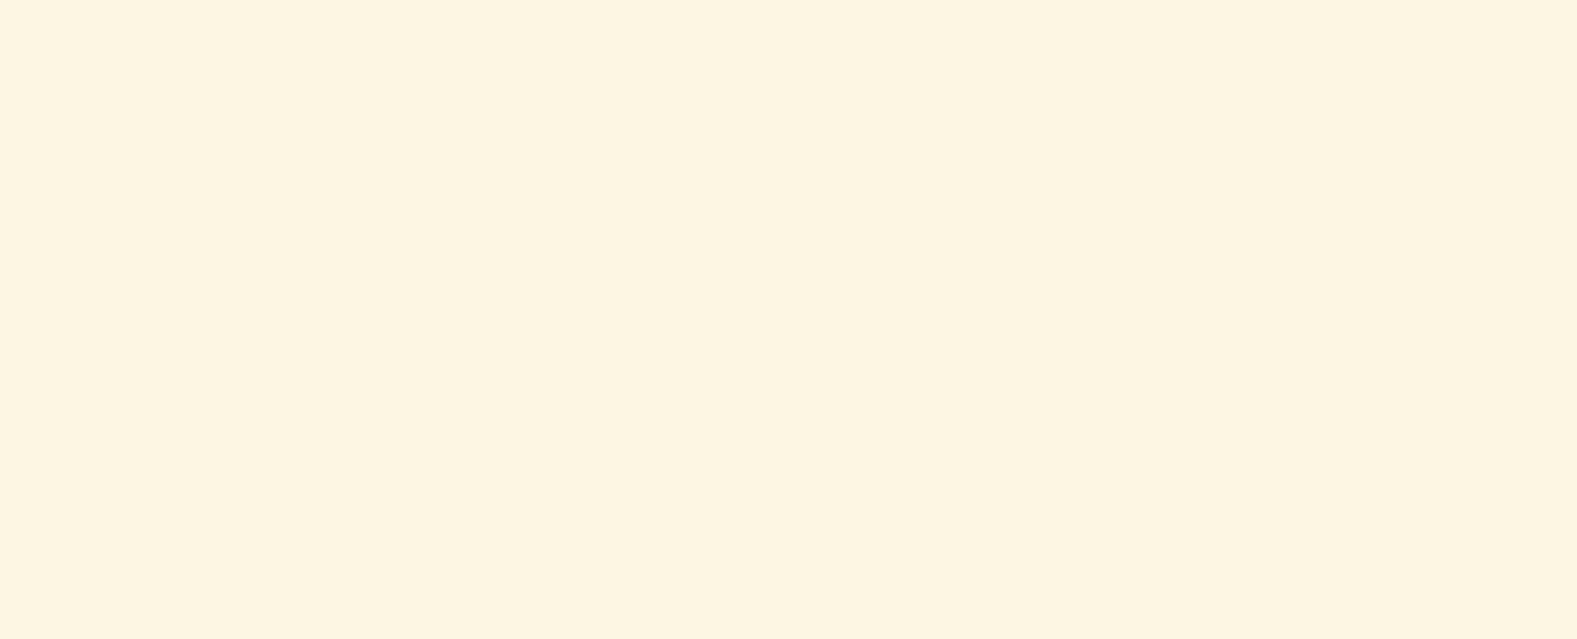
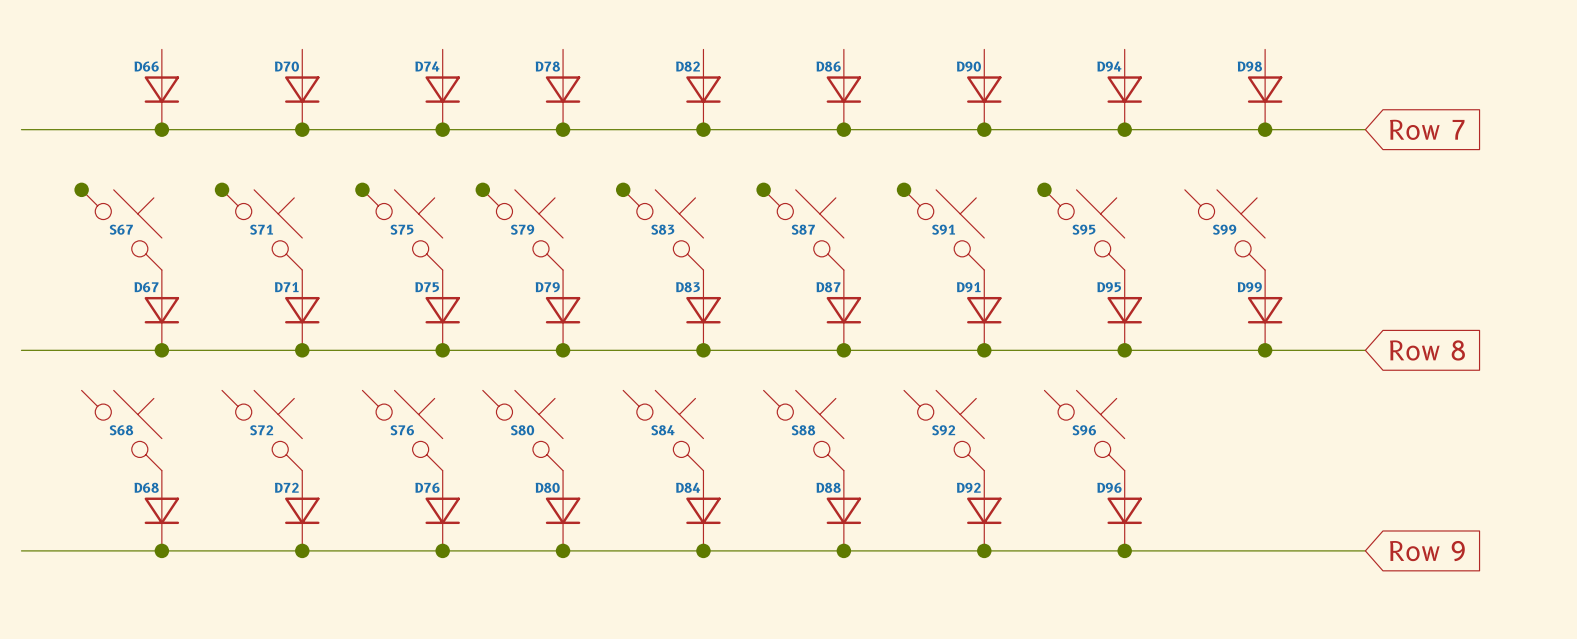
D66: none -> (161, 89)
D70: none -> (302, 89)
D74: none -> (442, 89)
D78: none -> (563, 89)
D82: none -> (703, 89)
D86: none -> (843, 89)
D90: none -> (984, 89)
D94: none -> (1124, 89)
D98: none -> (1265, 89)
wire: none -> (21, 129) (1365, 129)
junction: none -> (161, 129)
junction: none -> (302, 129)
junction: none -> (442, 129)
junction: none -> (563, 129)
junction: none -> (703, 129)
junction: none -> (843, 129)
junction: none -> (984, 129)
junction: none -> (1124, 129)
junction: none -> (1265, 129)
global label: none -> Row 7 (1427, 129)
junction: none -> (81, 189)
junction: none -> (222, 189)
junction: none -> (362, 189)
junction: none -> (482, 189)
junction: none -> (623, 189)
junction: none -> (763, 189)
junction: none -> (904, 189)
junction: none -> (1044, 189)
S67: none -> (121, 229)
S71: none -> (262, 229)
S75: none -> (402, 229)
S79: none -> (522, 229)
S83: none -> (663, 229)
S87: none -> (803, 229)
S91: none -> (944, 229)
S95: none -> (1084, 229)
S99: none -> (1224, 229)
D67: none -> (161, 310)
D71: none -> (302, 310)
D75: none -> (442, 310)
D79: none -> (563, 310)
D83: none -> (703, 310)
D87: none -> (843, 310)
D91: none -> (984, 310)
D95: none -> (1124, 310)
D99: none -> (1265, 310)
wire: none -> (21, 350) (1365, 350)
junction: none -> (161, 350)
junction: none -> (302, 350)
junction: none -> (442, 350)
junction: none -> (563, 350)
junction: none -> (703, 350)
junction: none -> (843, 350)
junction: none -> (984, 350)
junction: none -> (1124, 350)
junction: none -> (1265, 350)
global label: none -> Row 8 (1427, 350)
S68: none -> (121, 430)
S72: none -> (262, 430)
S76: none -> (402, 430)
S80: none -> (522, 430)
S84: none -> (663, 430)
S88: none -> (803, 430)
S92: none -> (944, 430)
S96: none -> (1084, 430)
D68: none -> (161, 510)
D72: none -> (302, 510)
D76: none -> (442, 510)
D80: none -> (563, 510)
D84: none -> (703, 510)
D88: none -> (843, 510)
D92: none -> (984, 510)
D96: none -> (1124, 510)
wire: none -> (21, 550) (1365, 550)
junction: none -> (161, 550)
junction: none -> (302, 550)
junction: none -> (442, 550)
junction: none -> (563, 550)
junction: none -> (703, 550)
junction: none -> (843, 550)
junction: none -> (984, 550)
junction: none -> (1124, 550)
global label: none -> Row 9 (1427, 551)

